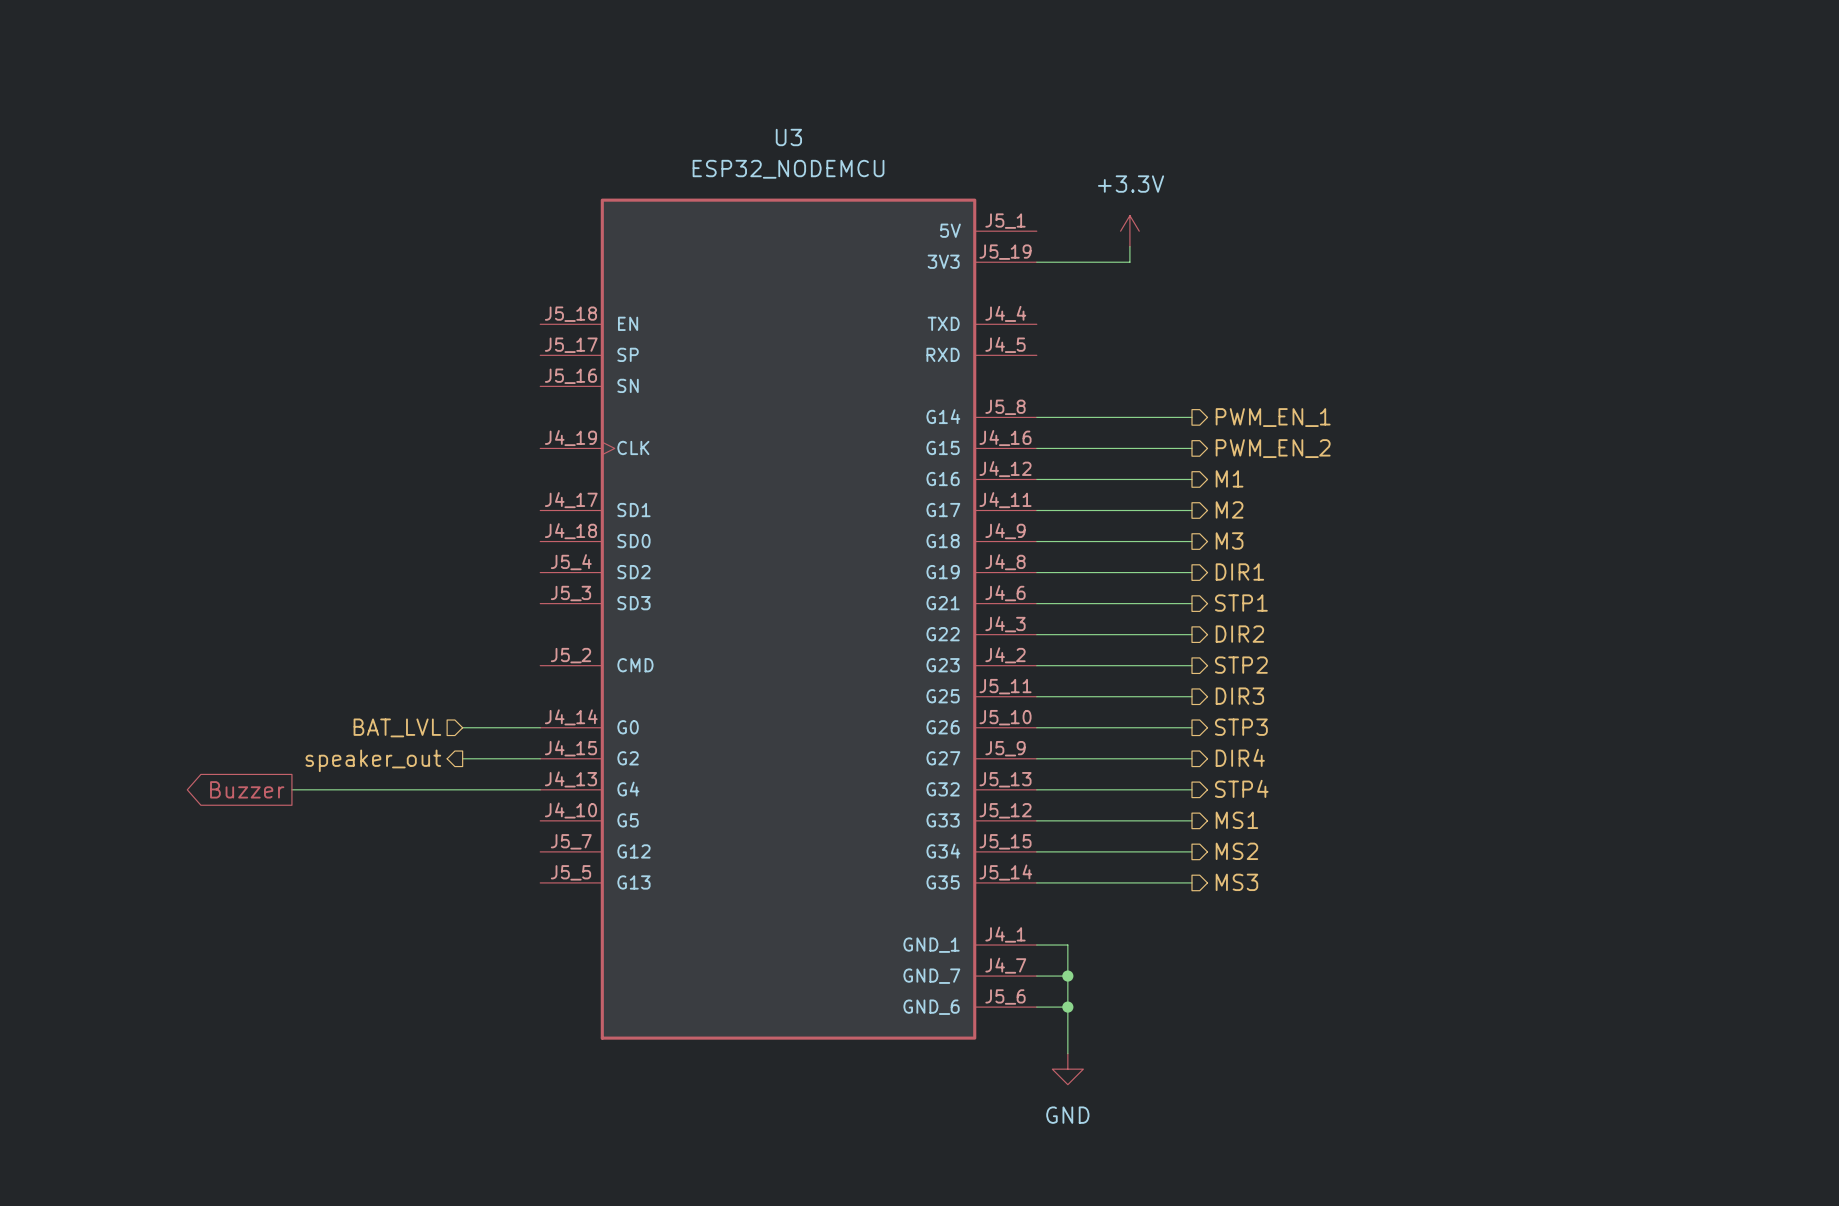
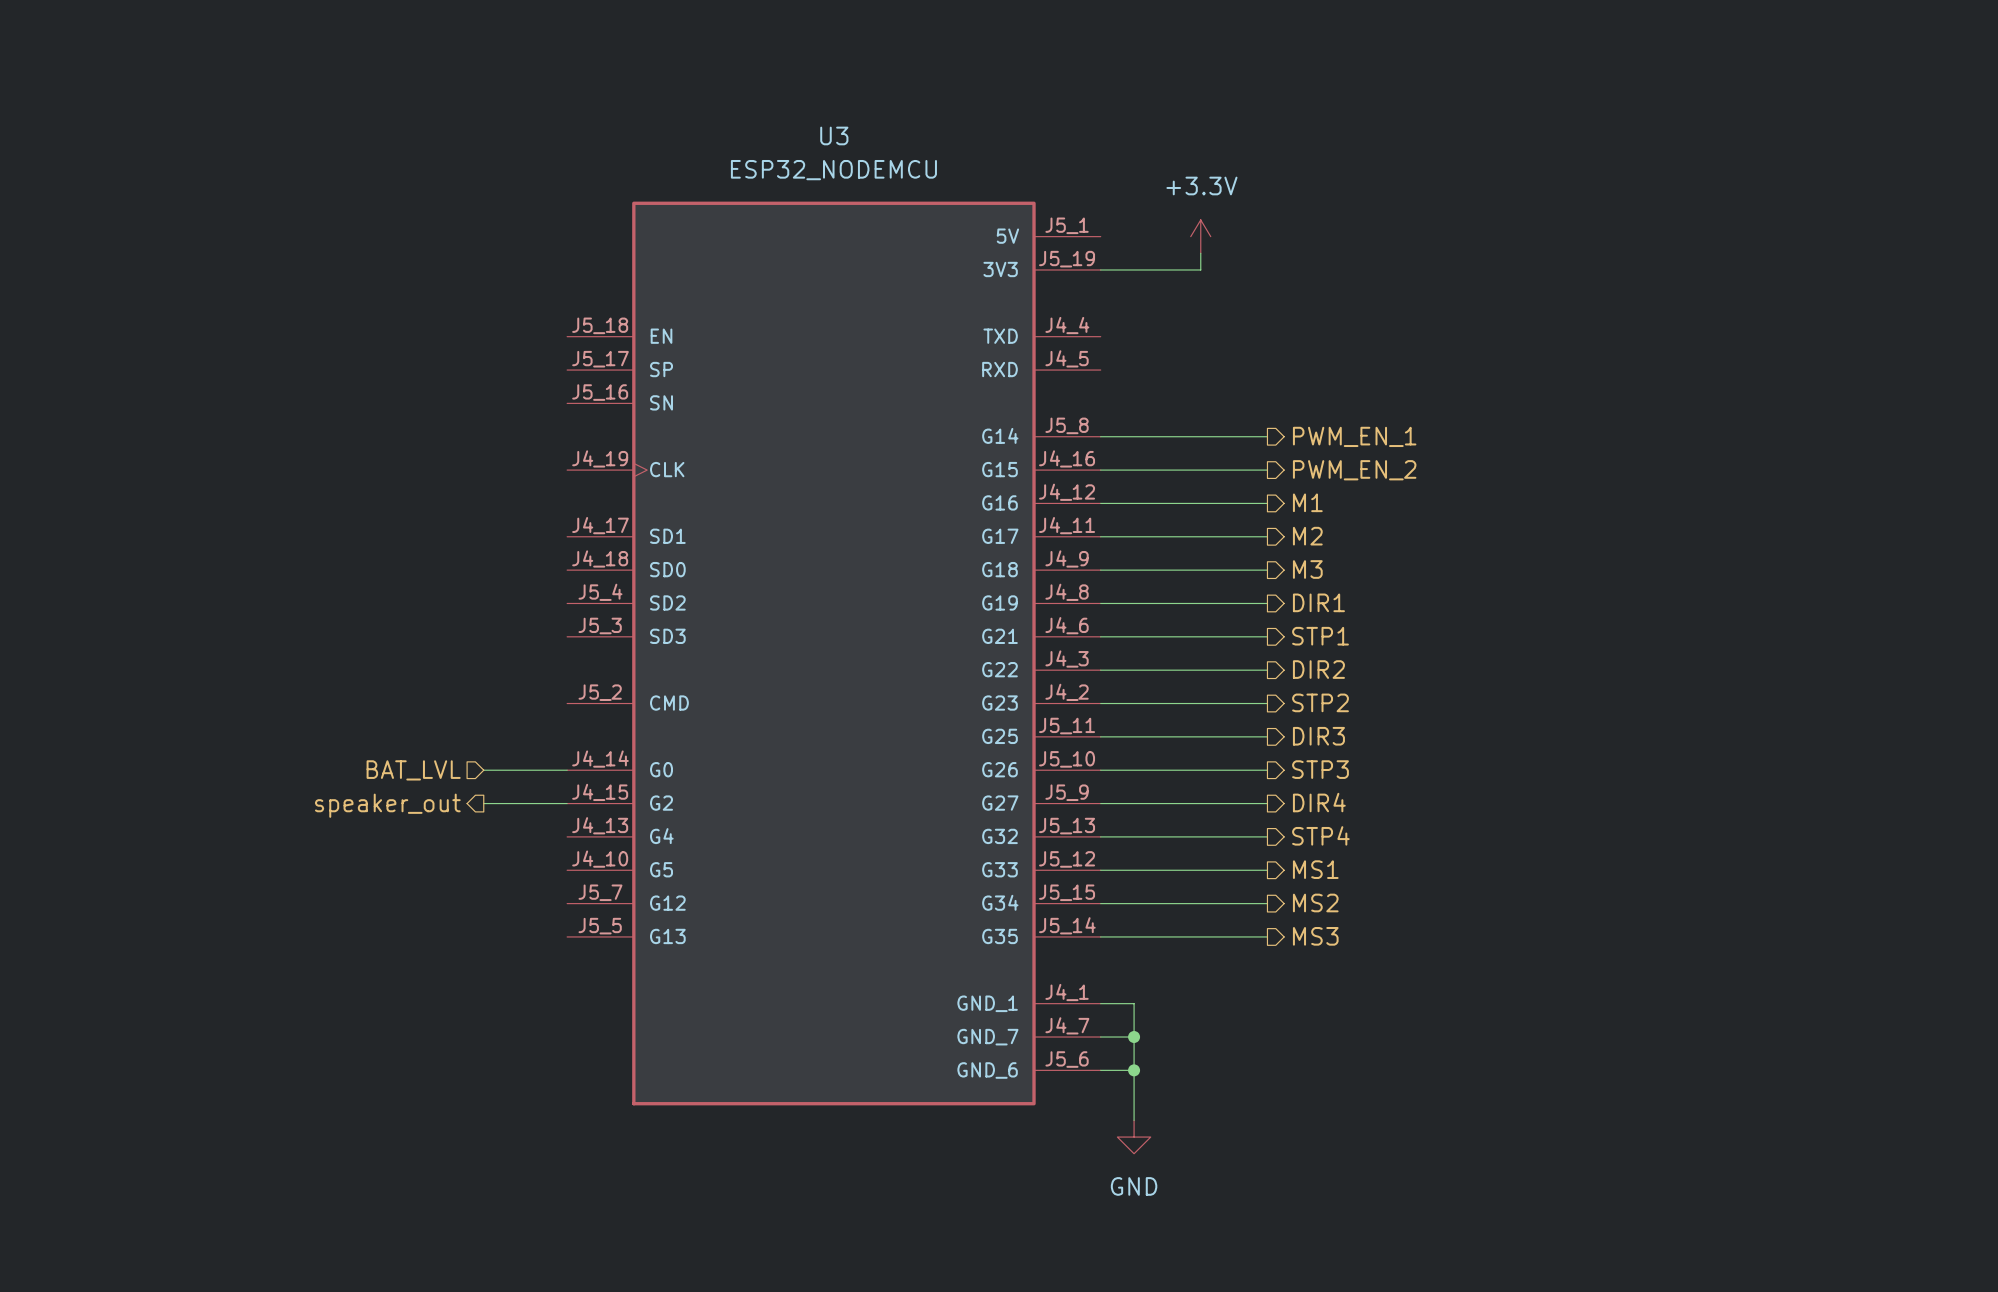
global label: Buzzer (247, 789) -> none
wire: (291, 789) (540, 789) -> none

